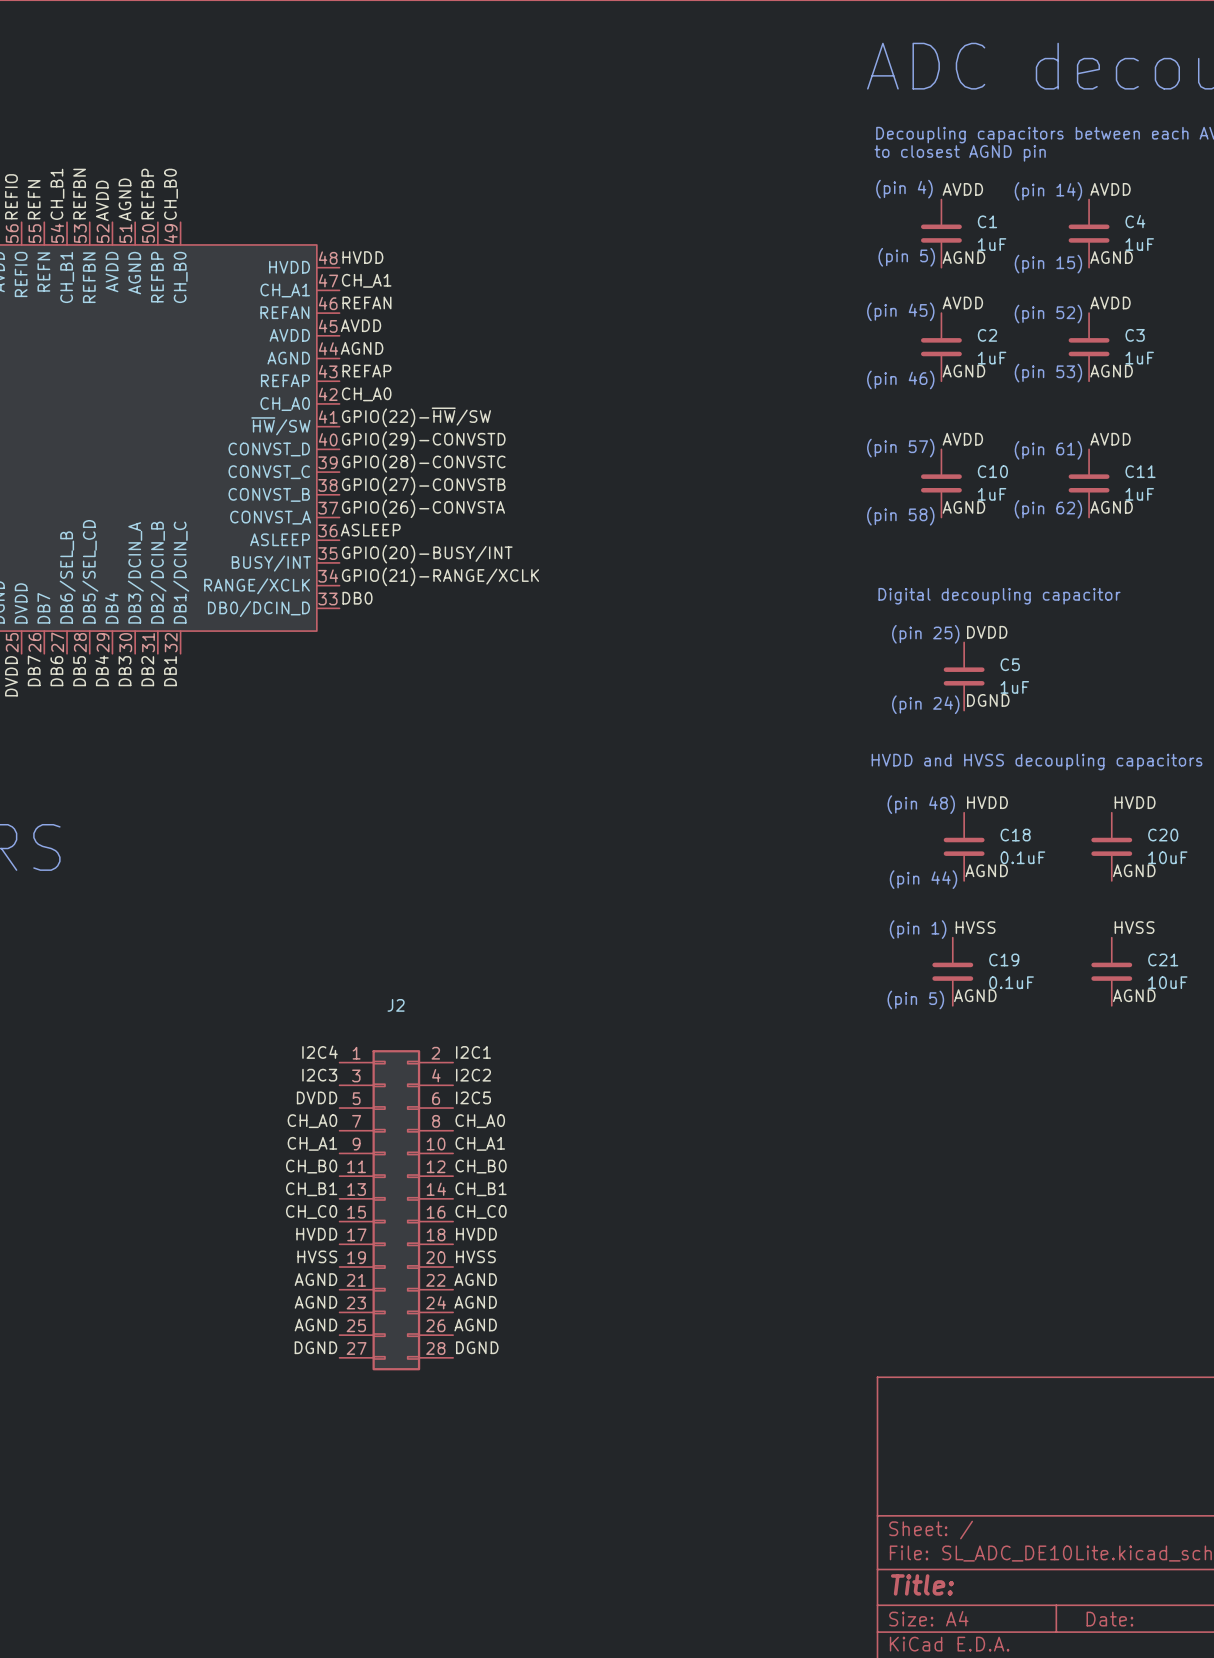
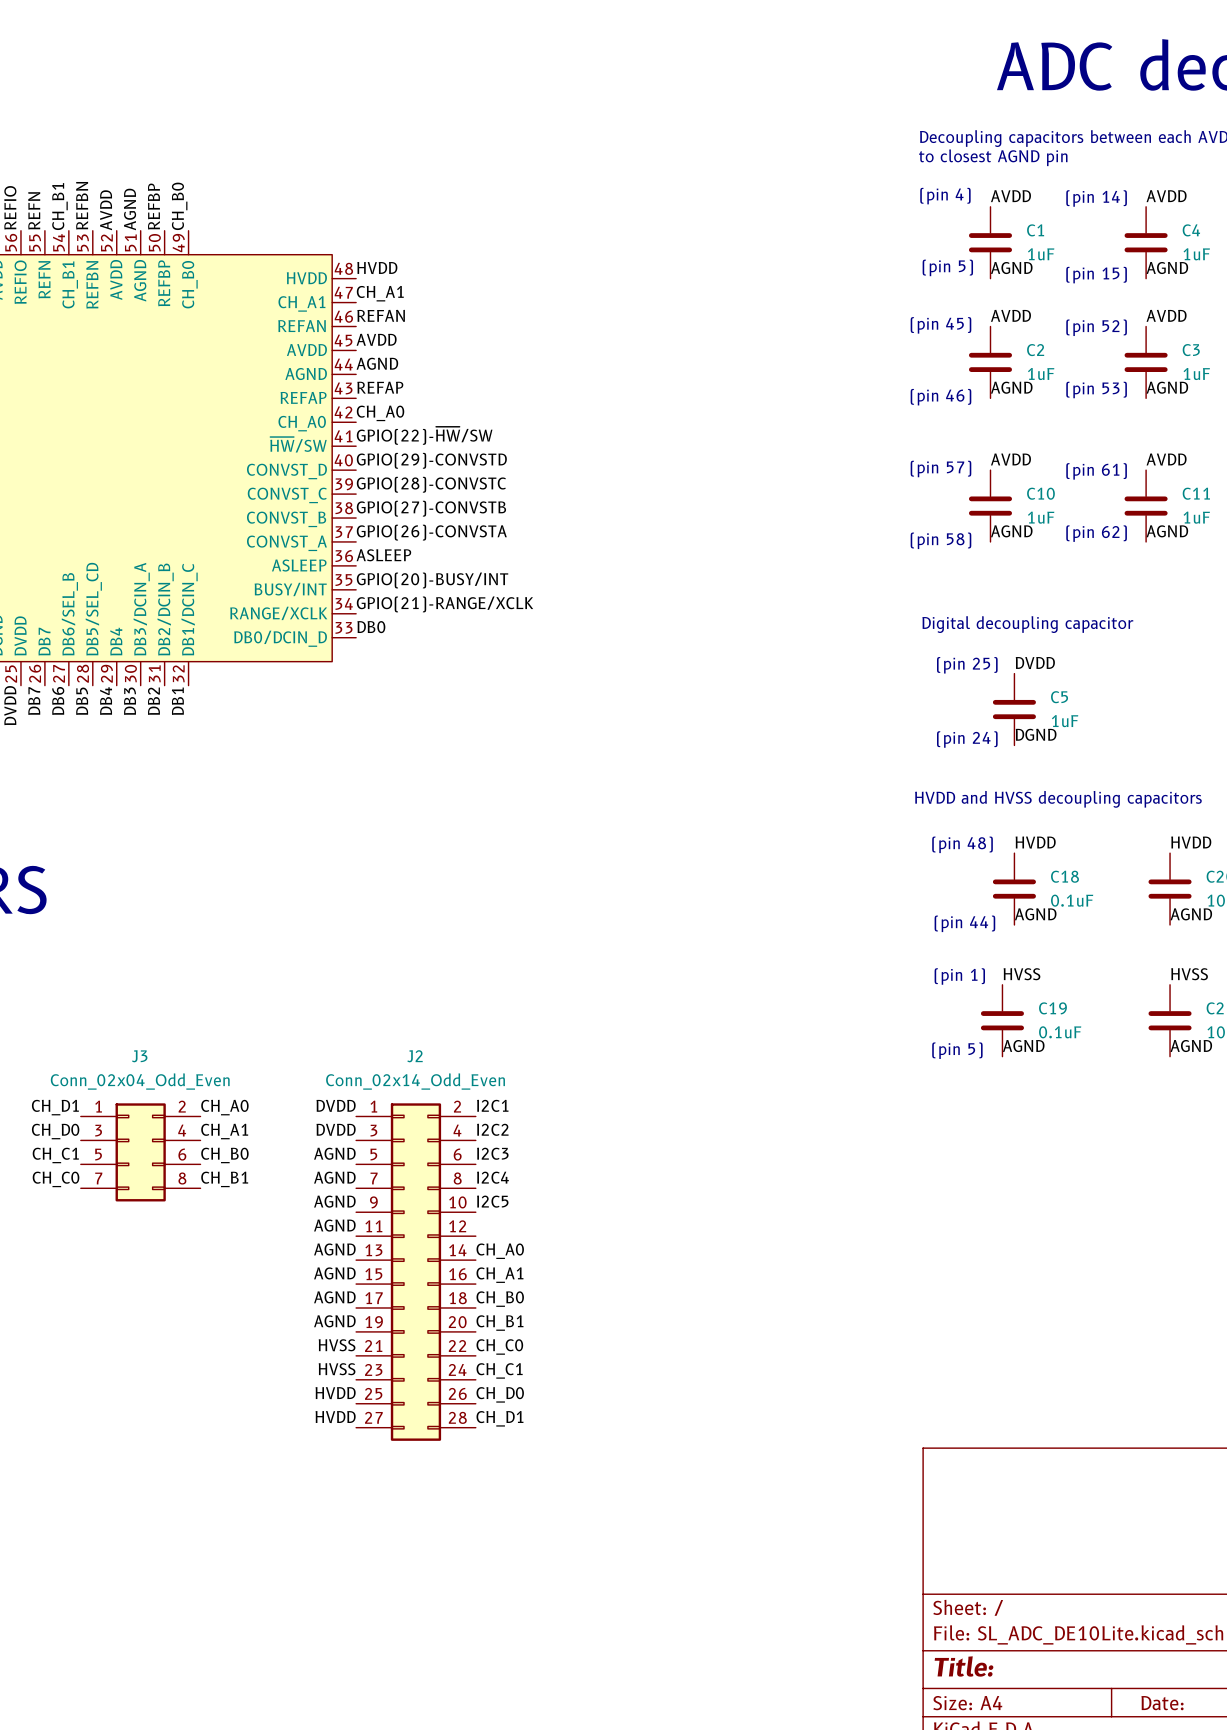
J2 value: none -> Conn_02x14_Odd_Even (415, 1081)
label: I2C4 (320, 1052) -> DVDD (336, 1105)
label: none -> CH_D1 (55, 1107)
label: none -> CH_A0 (224, 1107)
label: none -> CH_D0 (55, 1131)
label: none -> CH_A1 (224, 1131)
label: I2C3 (319, 1075) -> DVDD (336, 1129)
J3: none -> Conn_02x04_Odd_Even (140, 1152)
label: DVDD (317, 1097) -> AGND (334, 1153)
label: I2C5 (473, 1097) -> I2C3 (492, 1153)
label: none -> CH_C1 (55, 1155)
label: none -> CH_B0 (224, 1155)
label: none -> CH_C0 (56, 1179)
label: none -> CH_B1 (224, 1179)
label: CH_A0 (312, 1121) -> AGND (334, 1177)
label: CH_A0 (480, 1121) -> I2C4 (492, 1177)
label: CH_A1 (312, 1143) -> AGND (334, 1201)
label: CH_A1 (480, 1143) -> I2C5 (492, 1201)
label: CH_B0 (311, 1166) -> AGND (334, 1225)
label: CH_B0 (481, 1166) -> none
label: CH_B1 (311, 1189) -> AGND (334, 1249)
label: CH_B1 (481, 1189) -> CH_A0 (500, 1251)
label: CH_C0 (311, 1211) -> AGND (334, 1273)
label: CH_C0 (481, 1211) -> CH_A1 (499, 1275)
label: HVDD (316, 1234) -> AGND (334, 1297)
label: HVDD (476, 1234) -> CH_B0 (500, 1299)
label: HVSS (317, 1256) -> AGND (334, 1321)
label: HVSS (475, 1256) -> CH_B1 (499, 1323)
label: AGND (315, 1279) -> HVSS (337, 1345)
label: AGND (475, 1279) -> CH_C0 (499, 1346)
label: AGND (315, 1302) -> HVSS (337, 1369)
label: AGND (475, 1302) -> CH_C1 (499, 1370)
label: AGND (315, 1325) -> HVDD (335, 1393)
label: AGND (475, 1325) -> CH_D0 (500, 1394)
label: DGND (315, 1347) -> HVDD (335, 1417)
label: DGND (477, 1347) -> CH_D1 (499, 1418)

